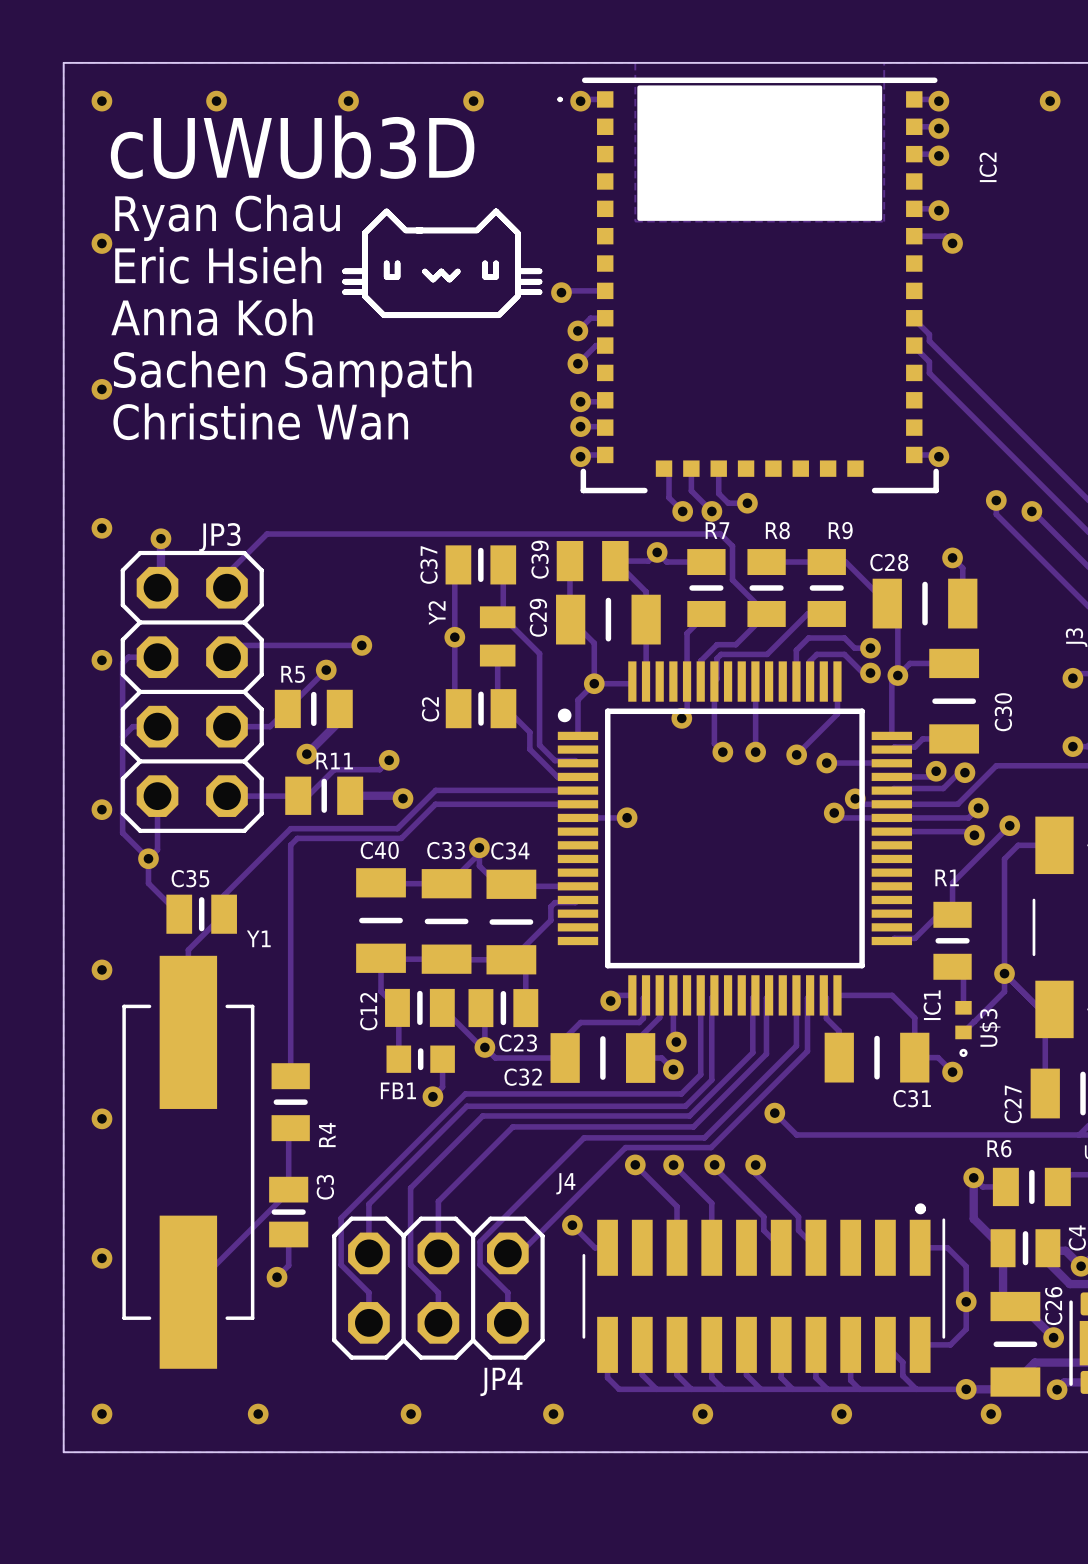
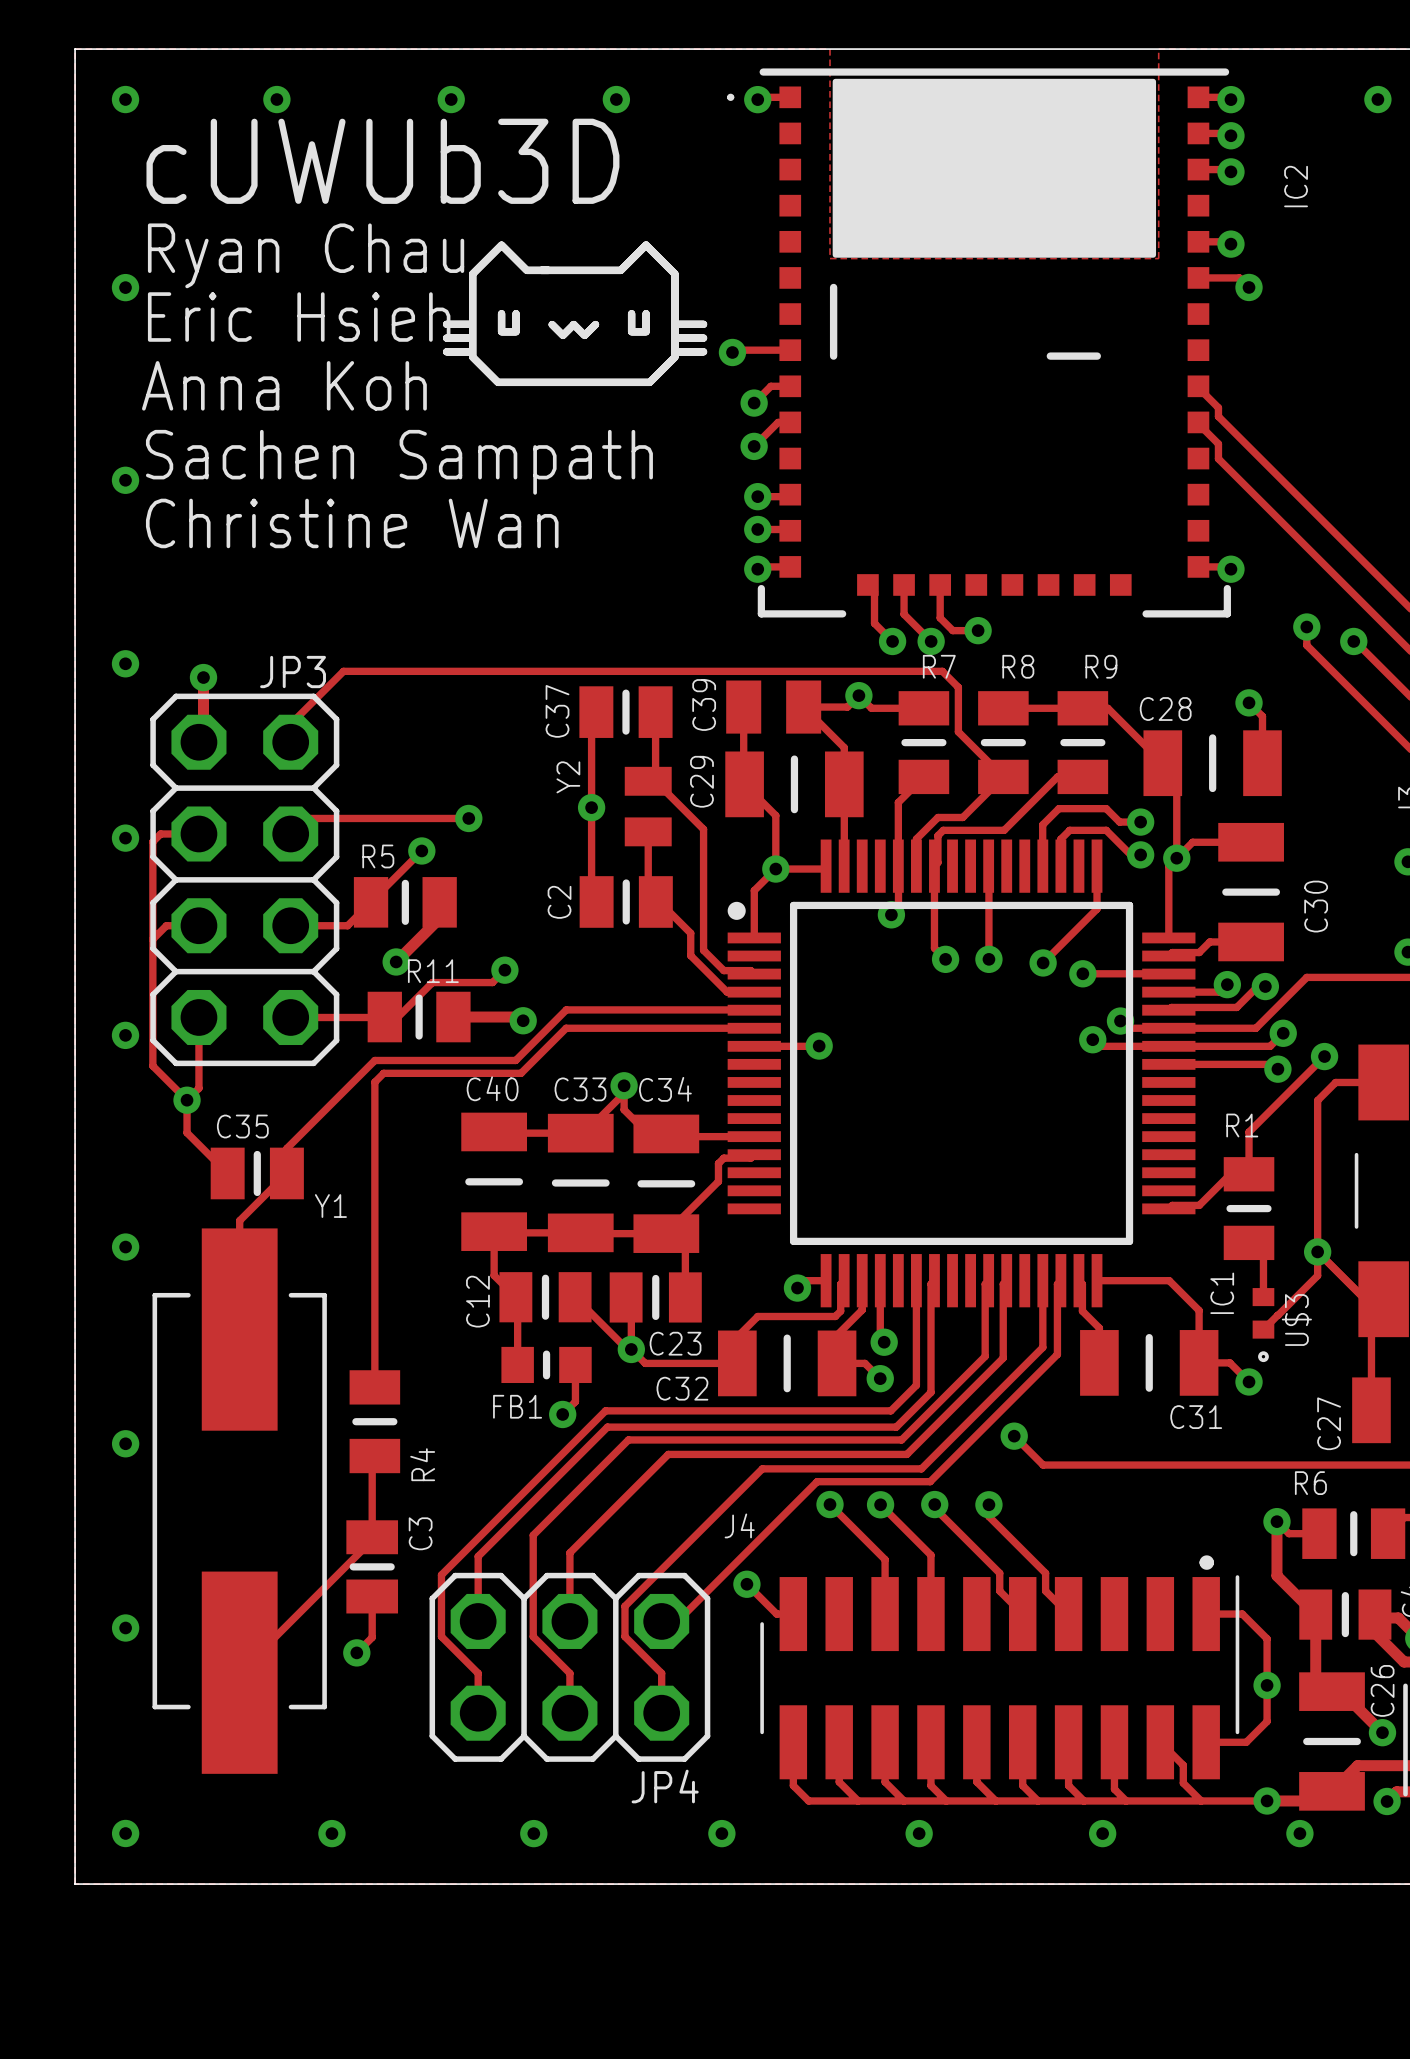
drawing: none -> [829, 283, 838, 360]
drawing: none -> [1046, 352, 1101, 360]

